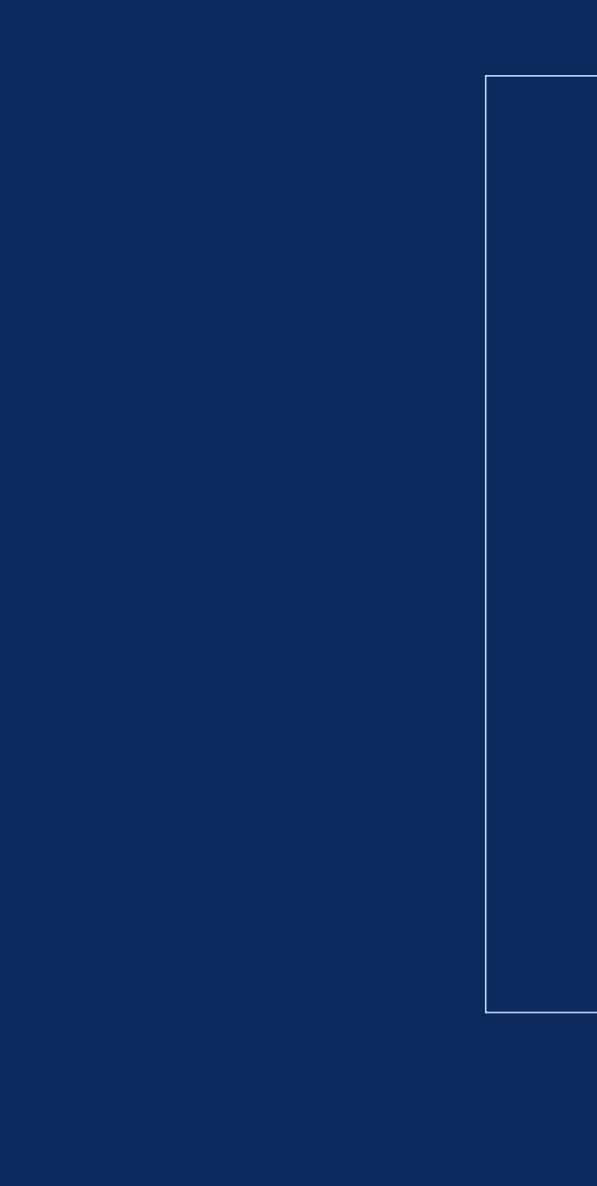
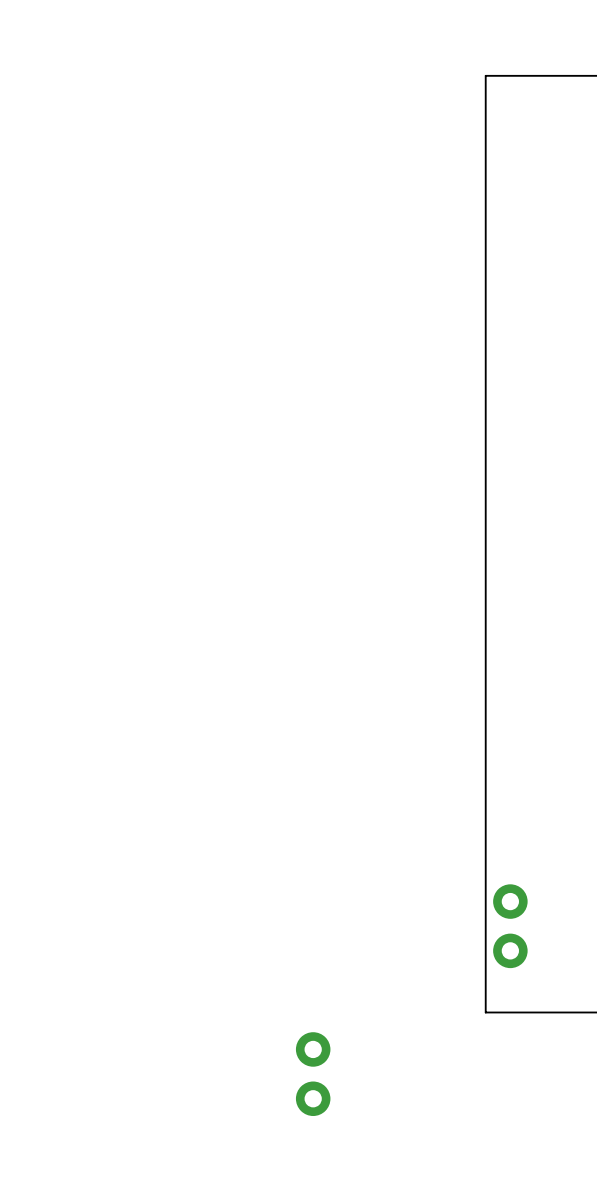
part: none -> (510, 926)
part: none -> (313, 1074)

